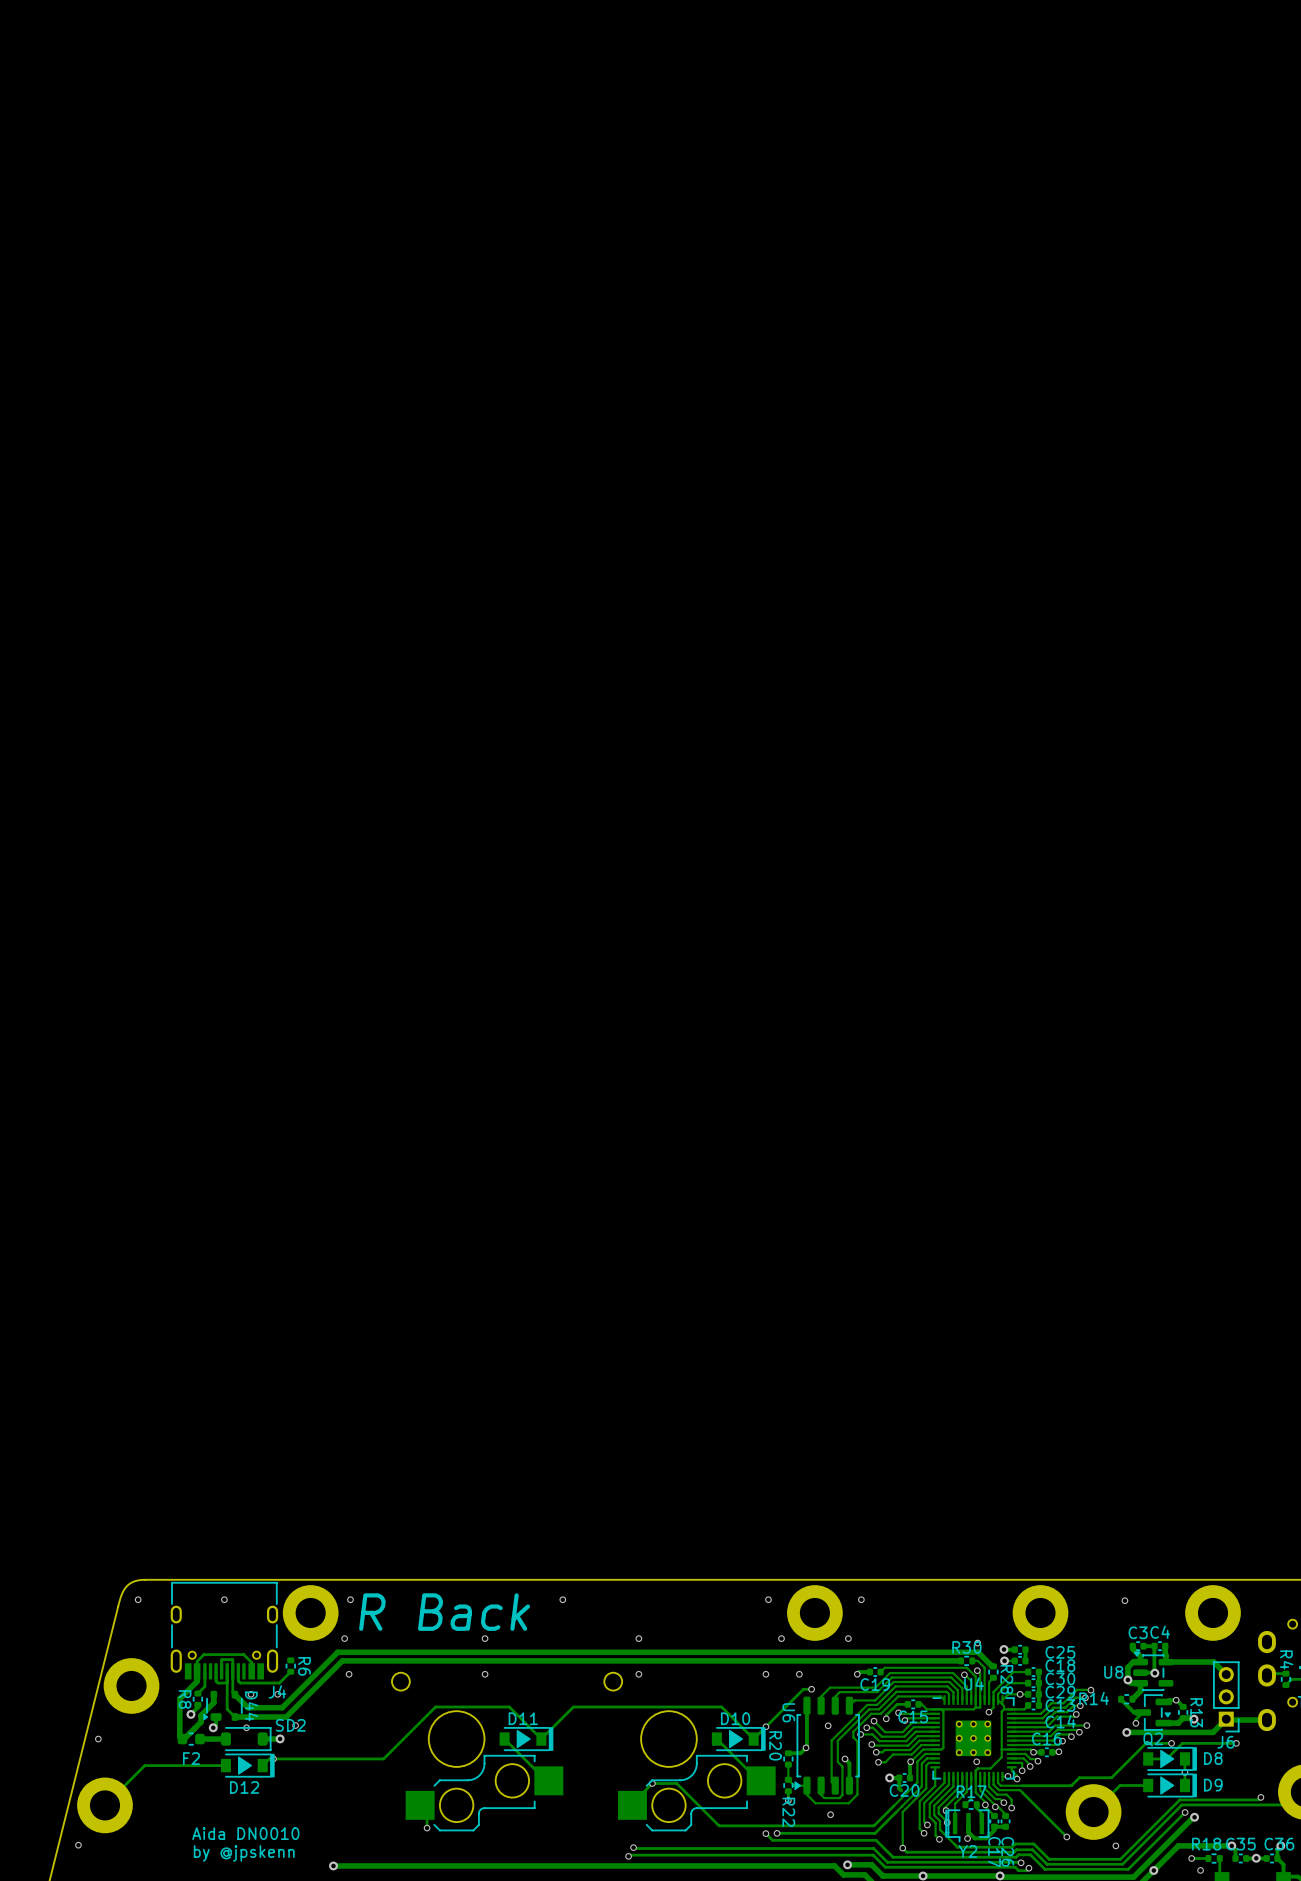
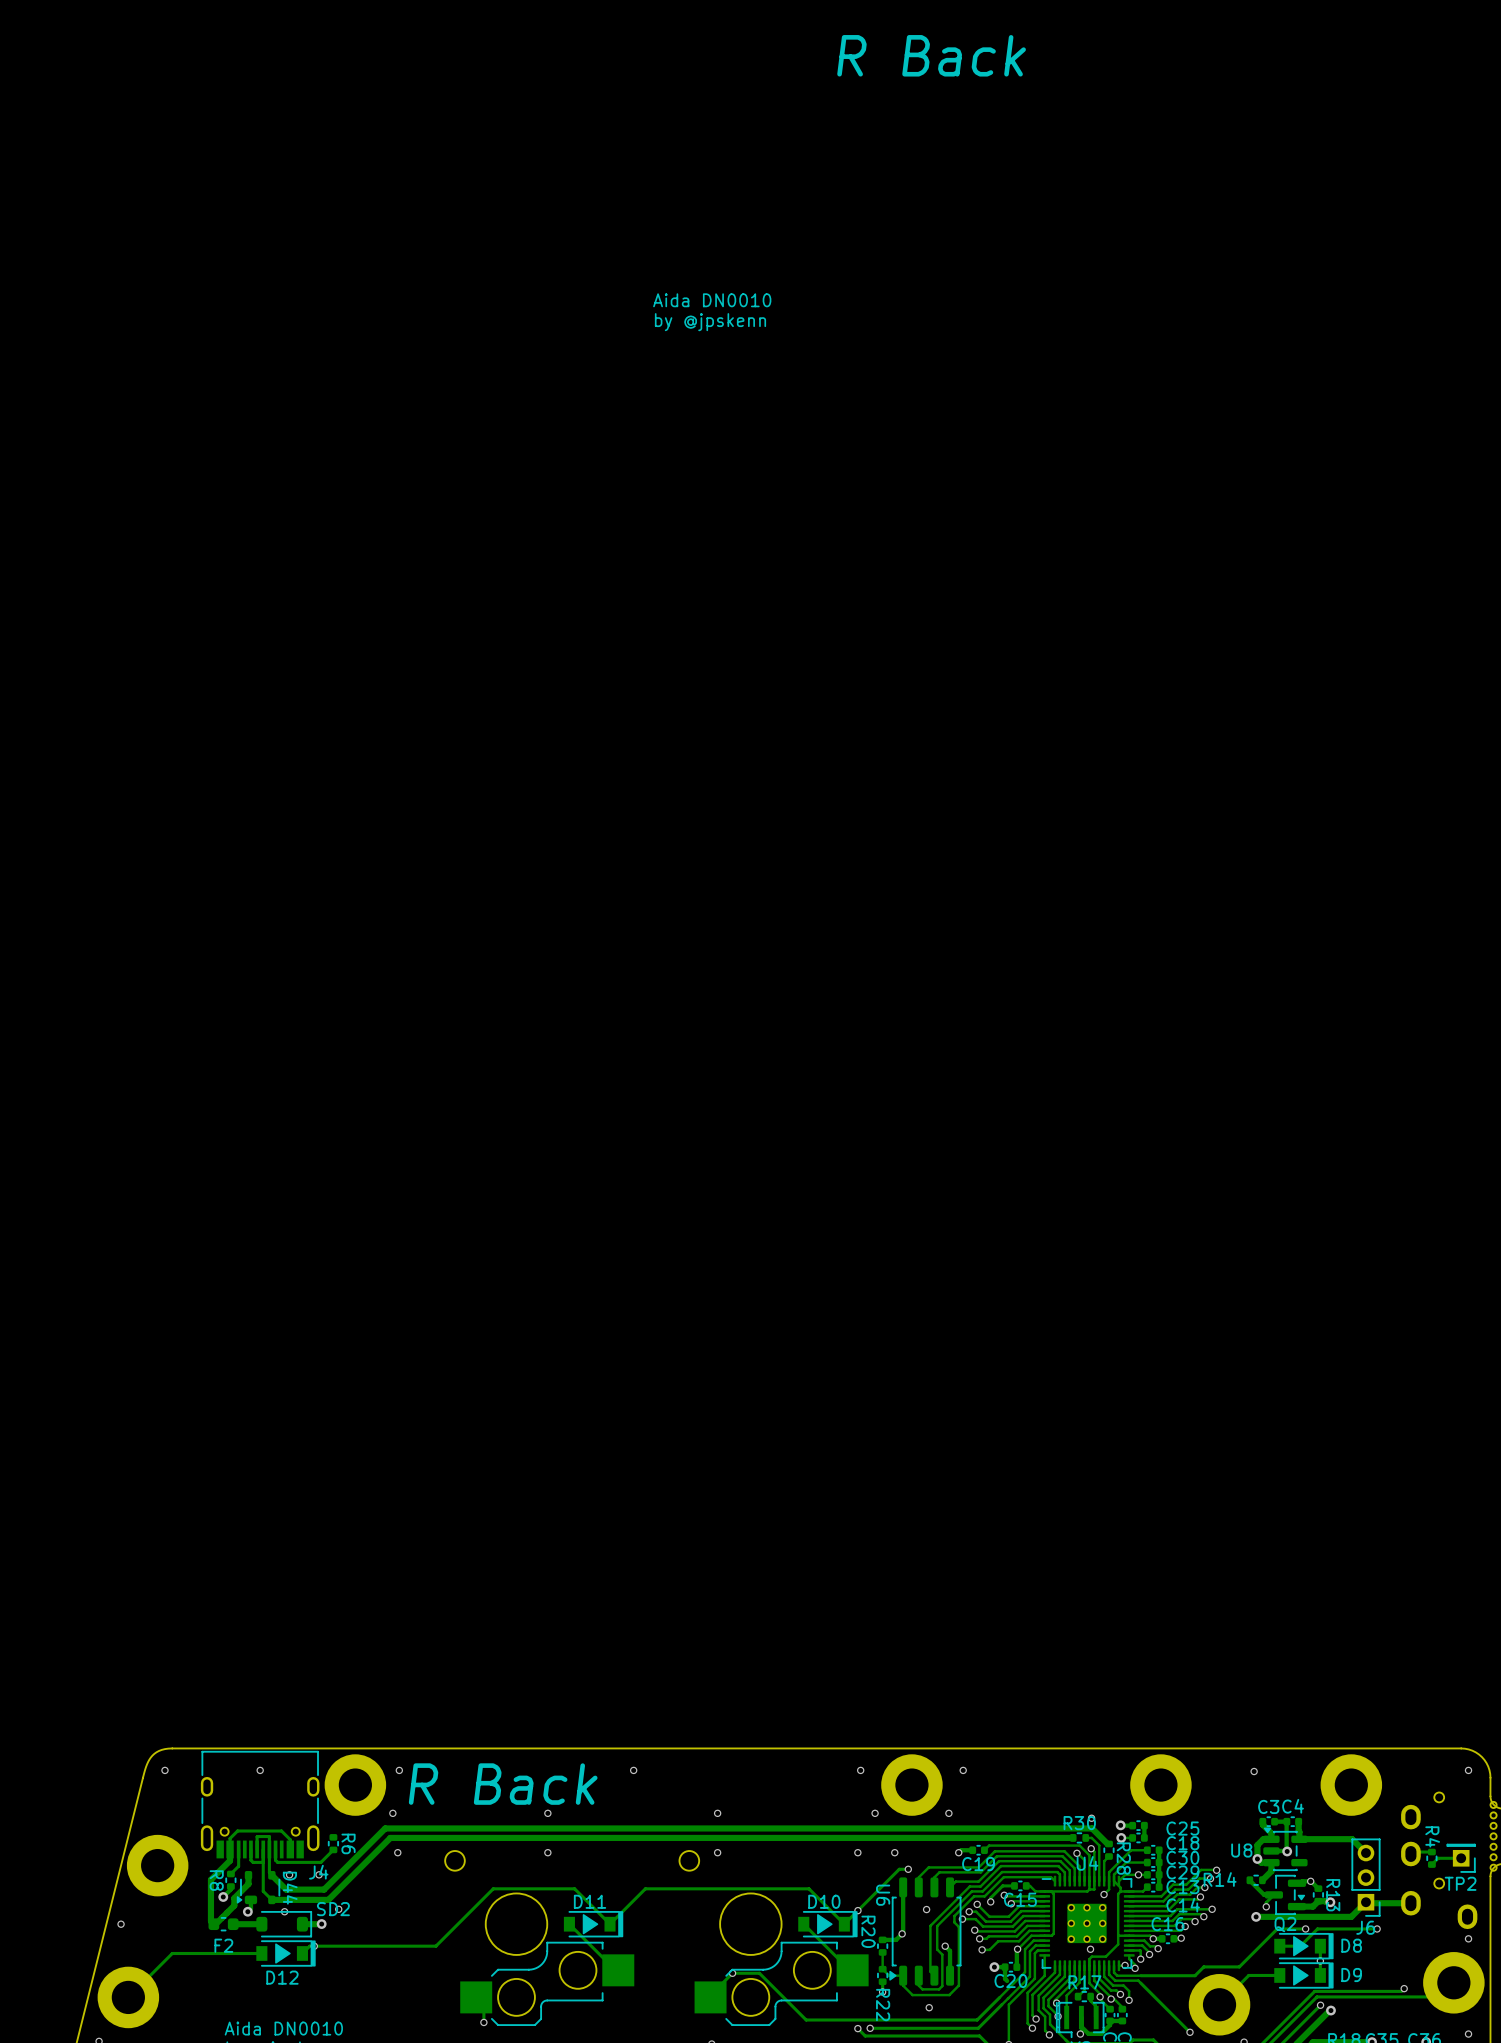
text: none -> R Back (931, 55)
text: none -> Aida DN0010 (712, 300)
text: none -> by @jpskenn (710, 322)

